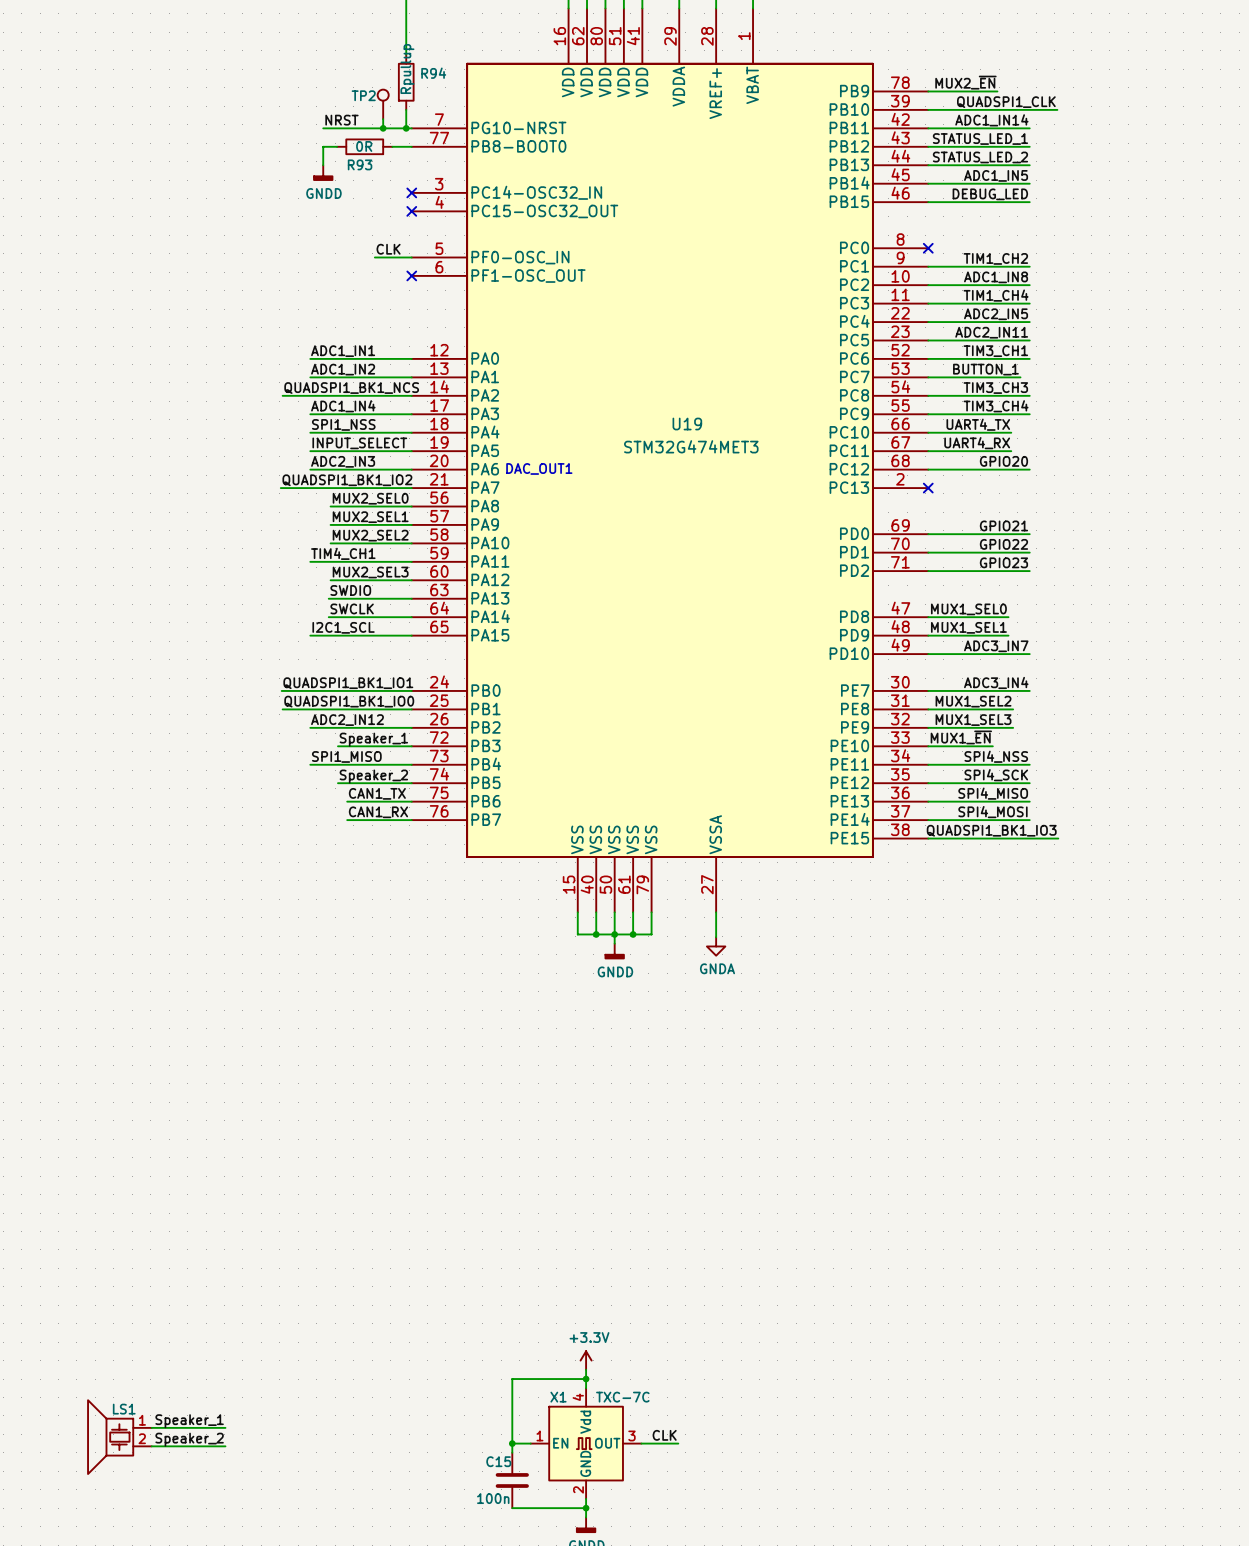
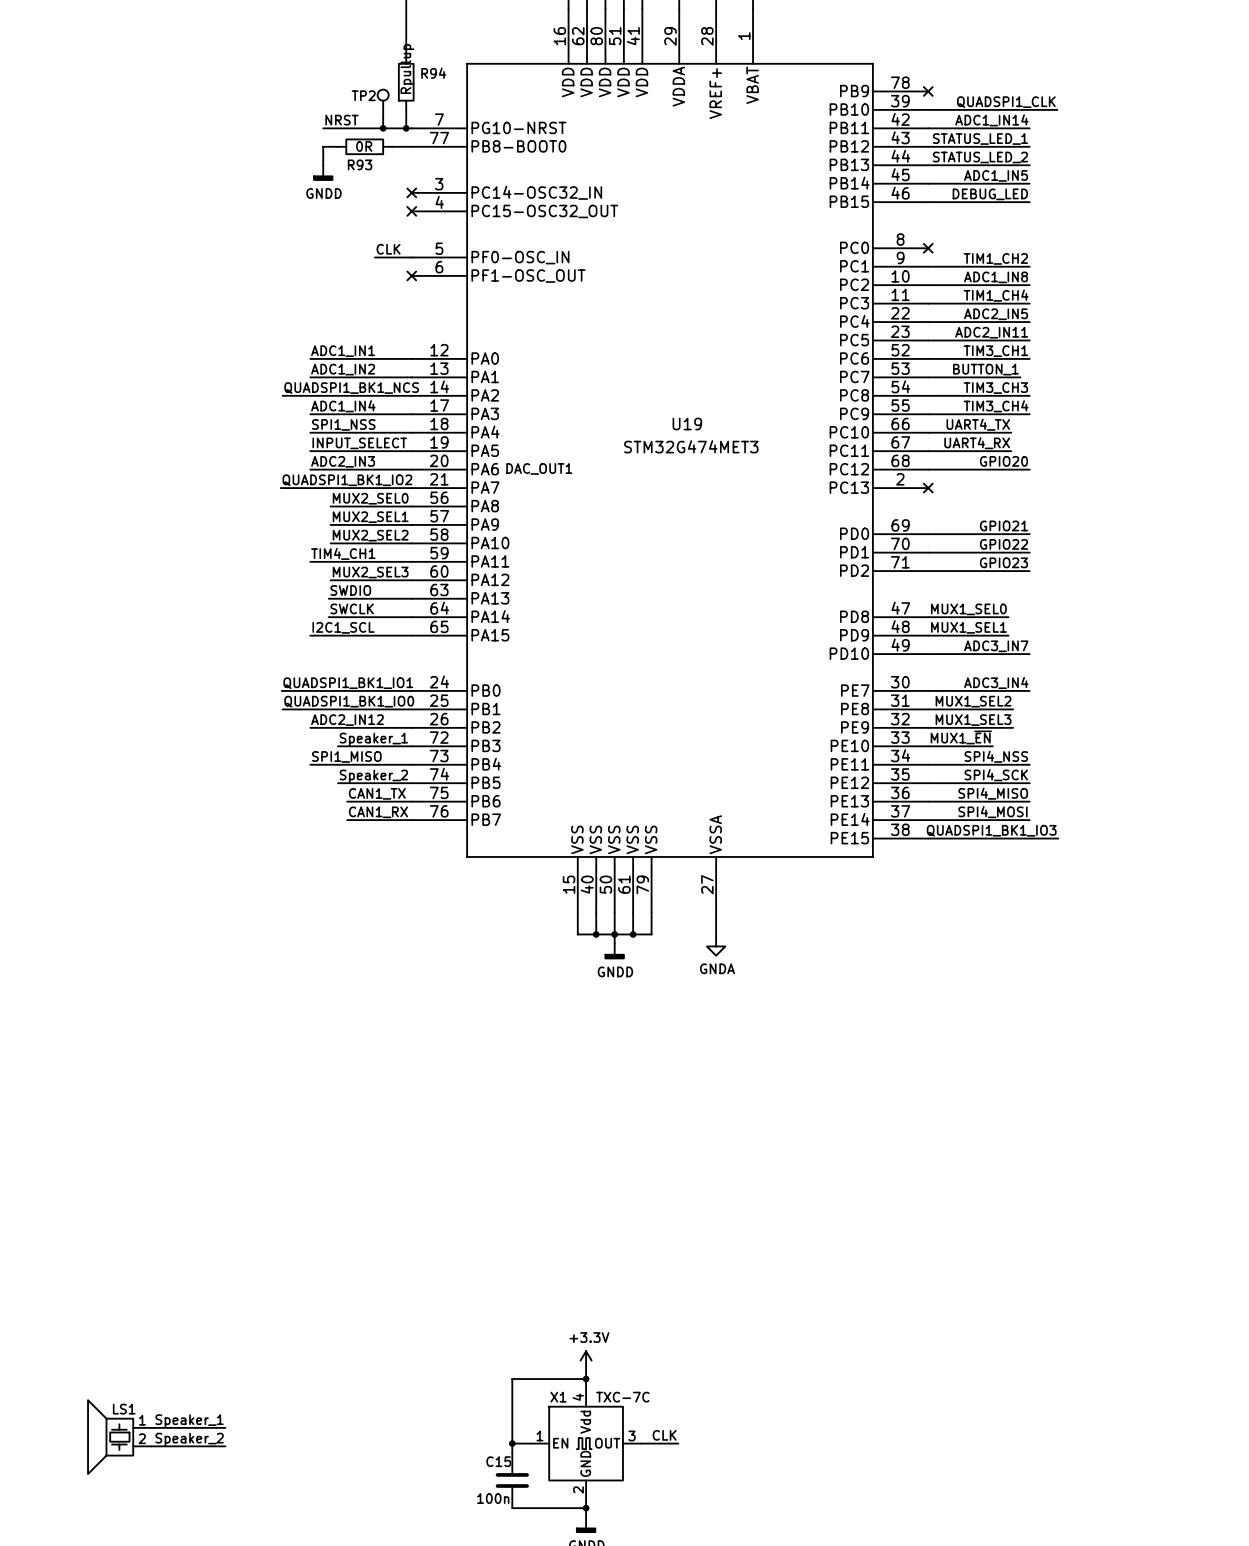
U19 symbol: [411, 8, 929, 913] -> [411, 8, 929, 913]
label: MUX2_~{EN} (965, 82) -> none
wire: (928, 91) (997, 91) -> none
no-connect mark: none -> (928, 91)

